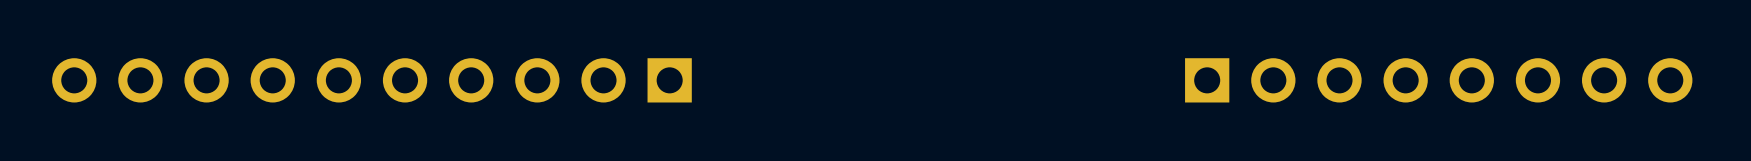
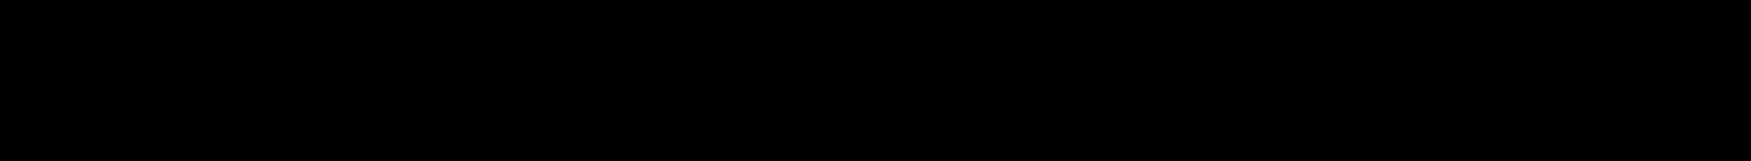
part: (371, 80) -> none
part: (1438, 80) -> none

